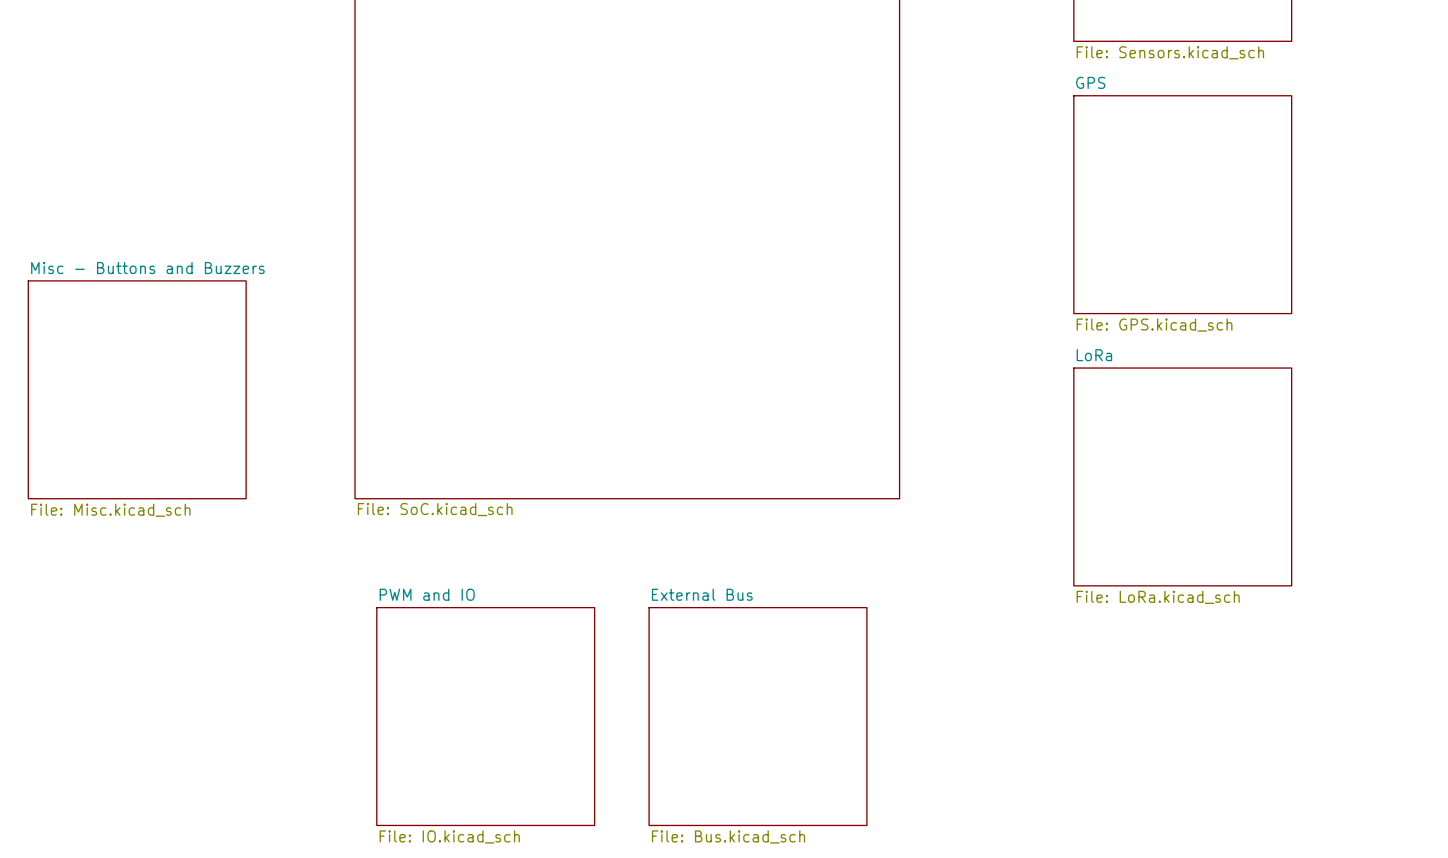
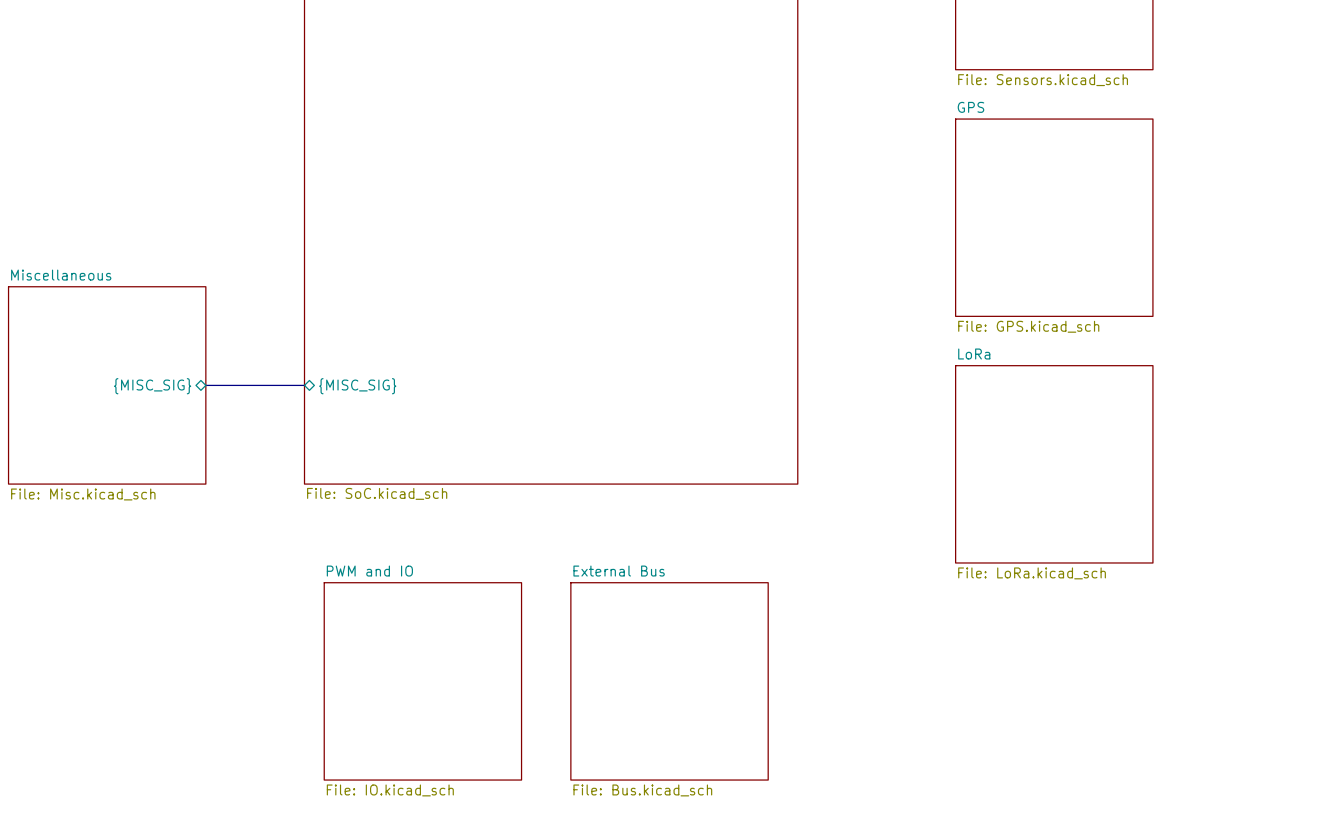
sheet Misc - Buttons and Buzzers name: Misc - Buttons and Buzzers (147, 268) -> Miscellaneous (61, 275)
bus: none -> (205, 385) (304, 385)
sheet pin: none -> {MISC_SIG} (152, 386)
sheet pin: none -> {MISC_SIG} (357, 386)

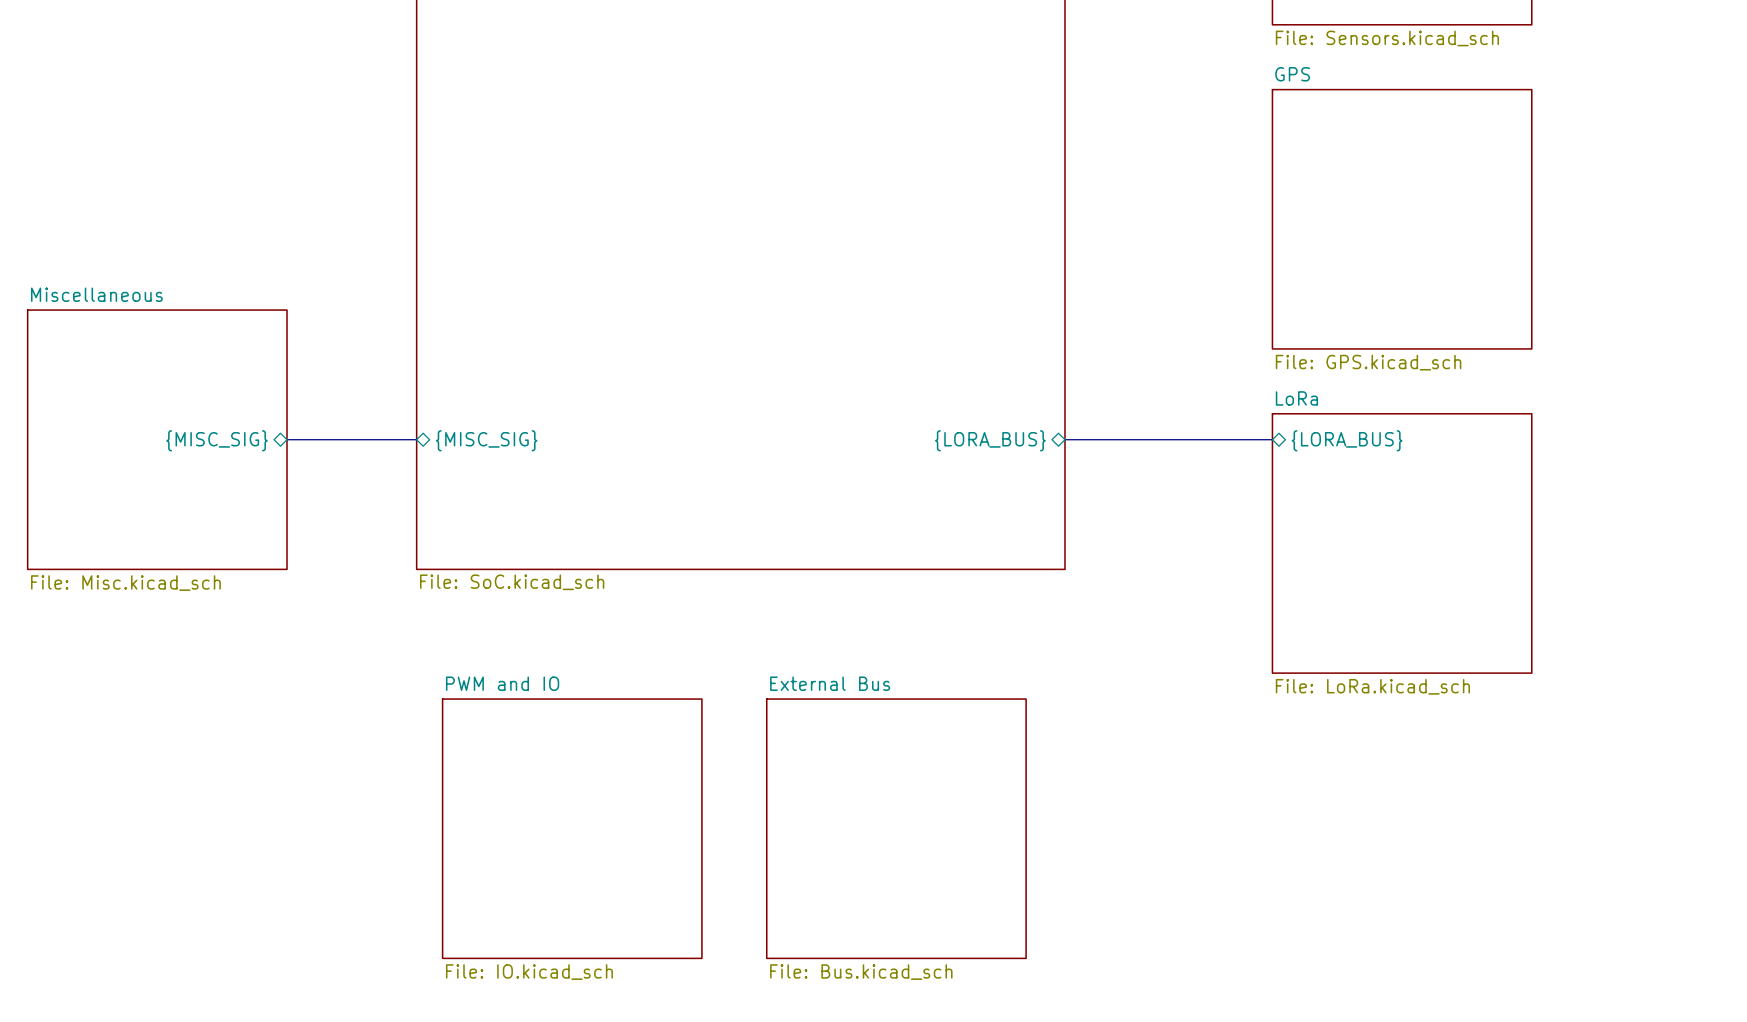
bus: none -> (1064, 439) (1272, 439)
sheet pin: none -> {LORA_BUS} (990, 440)
sheet pin: none -> {LORA_BUS} (1347, 440)

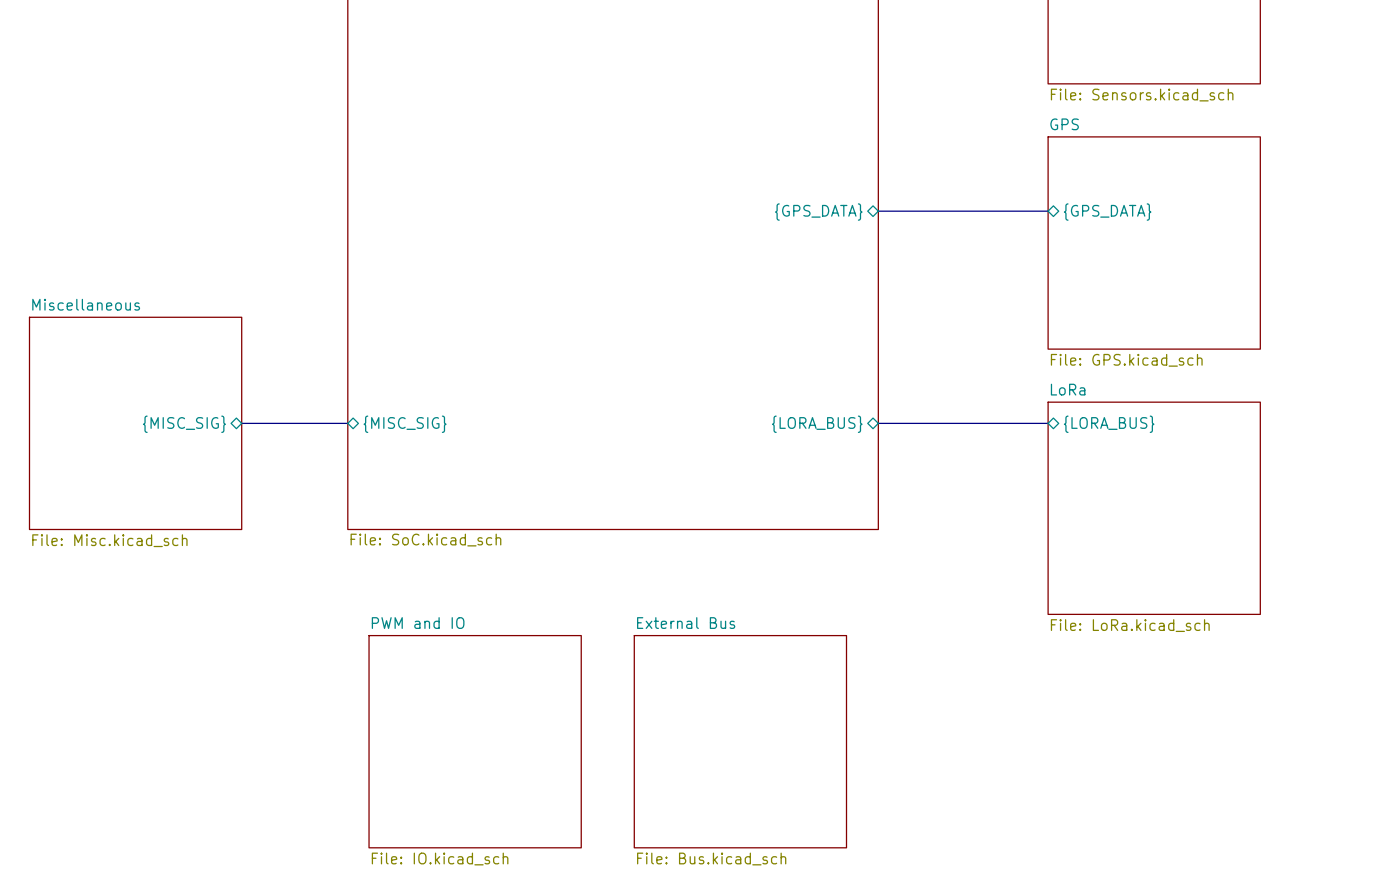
bus: none -> (878, 211) (1048, 211)
sheet pin: none -> {GPS_DATA} (818, 212)
sheet pin: none -> {GPS_DATA} (1107, 212)

